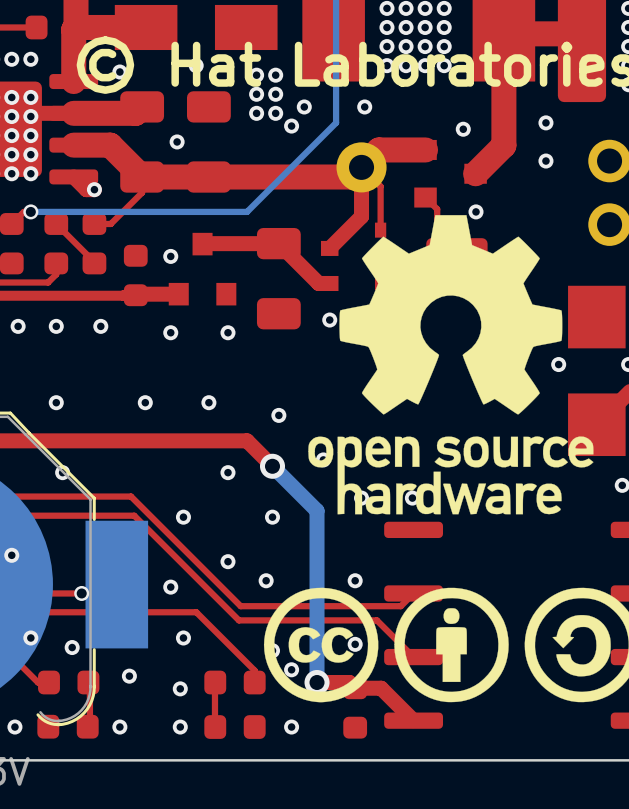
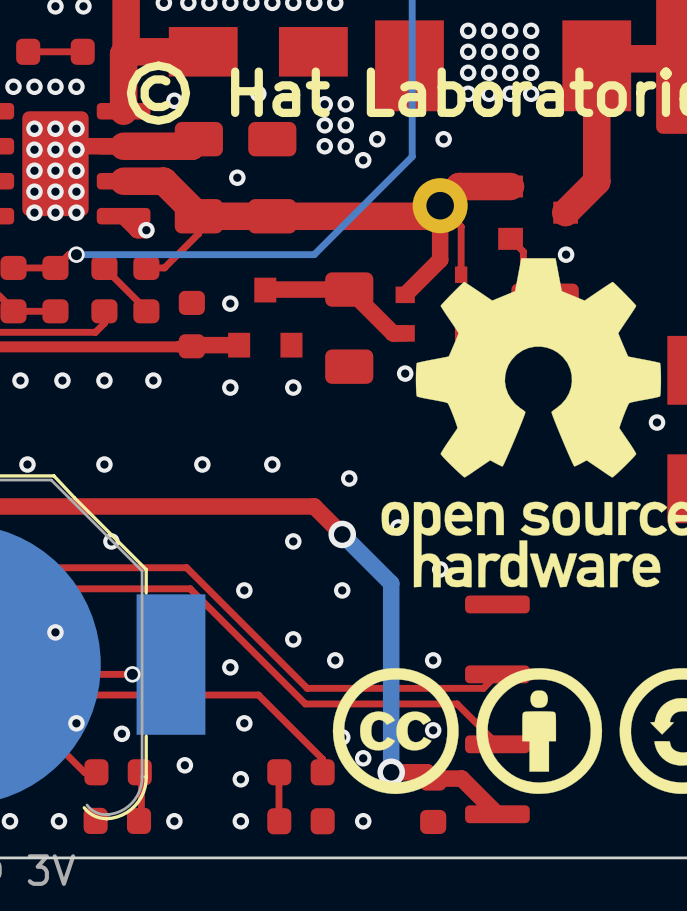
via: (545, 122) -> none
via: (463, 129) -> none
via: (545, 161) -> none
via: (412, 498) -> none

